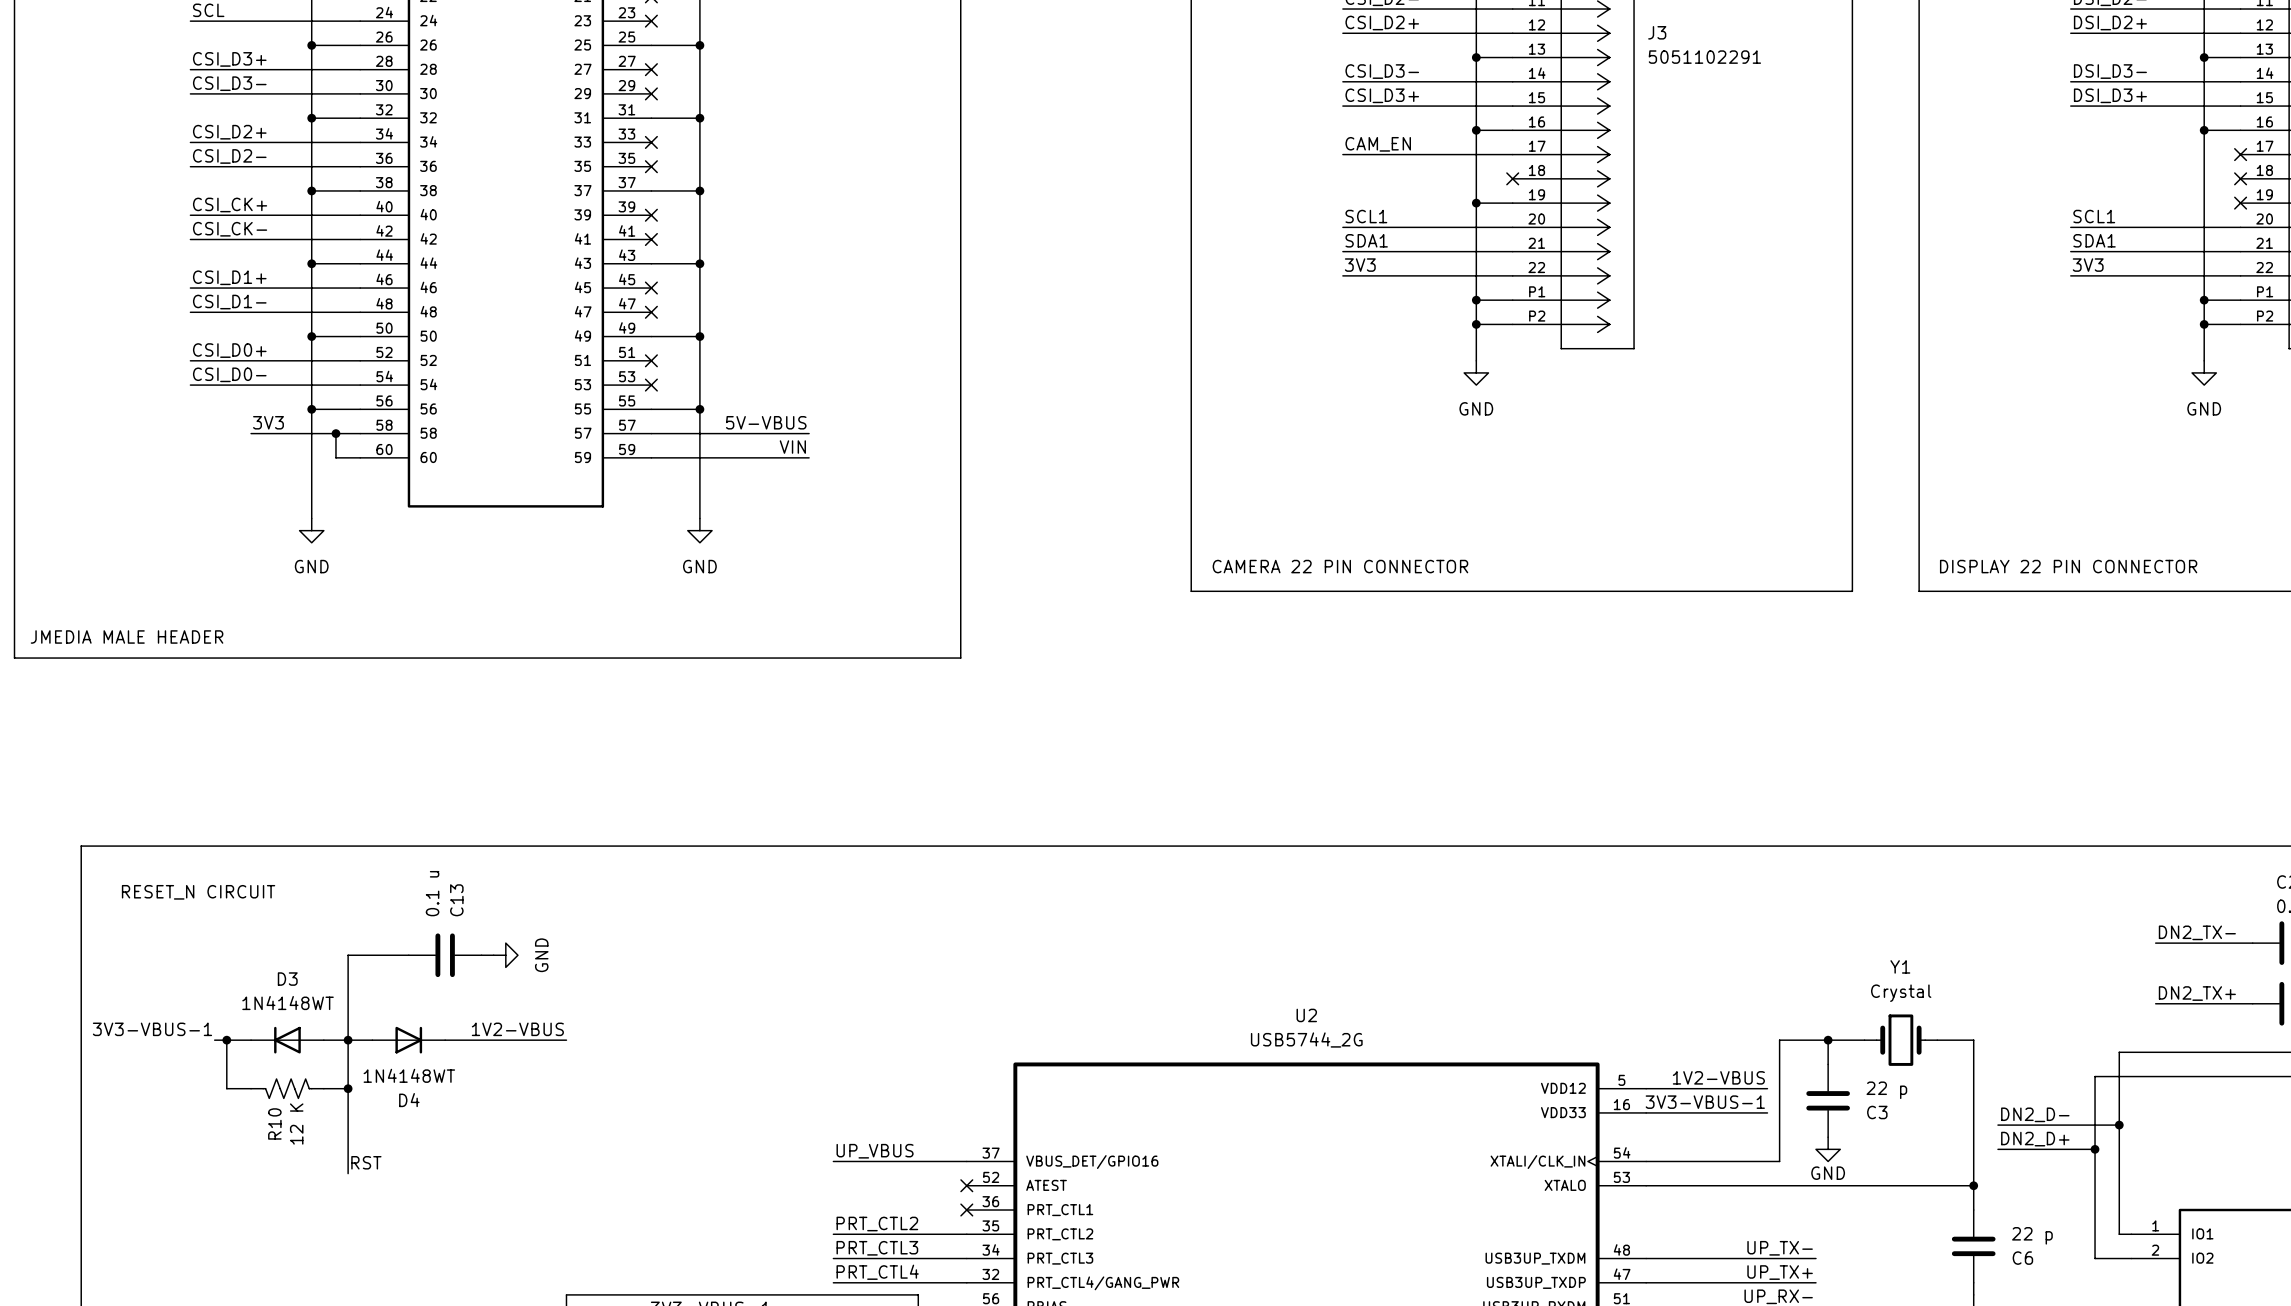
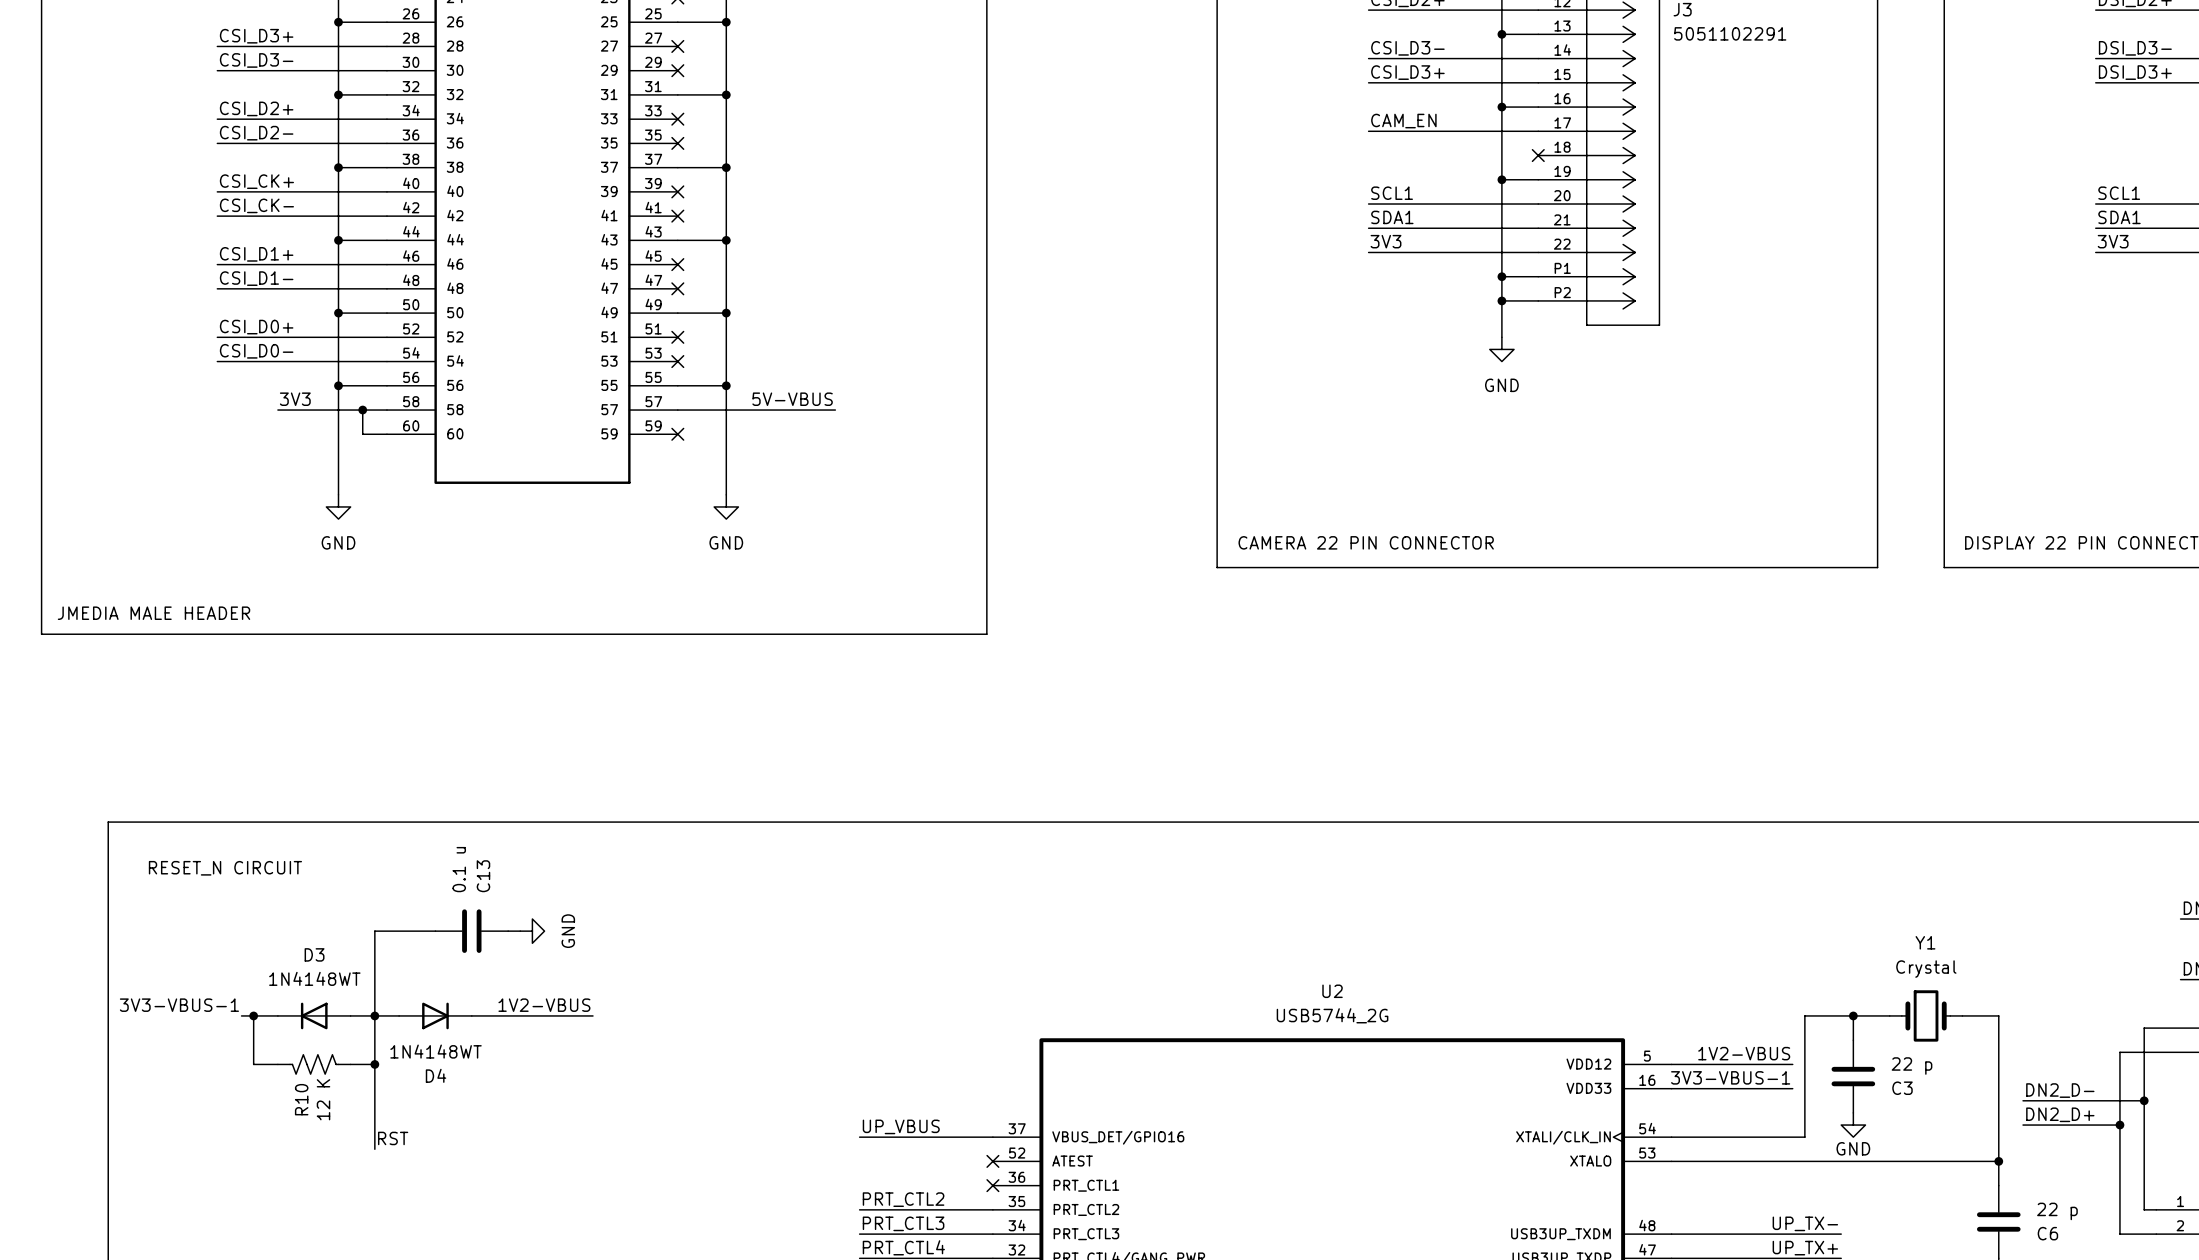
label: VIN (792, 447) -> none
wire: (651, 457) (809, 457) -> none
no-connect mark: none -> (677, 434)

